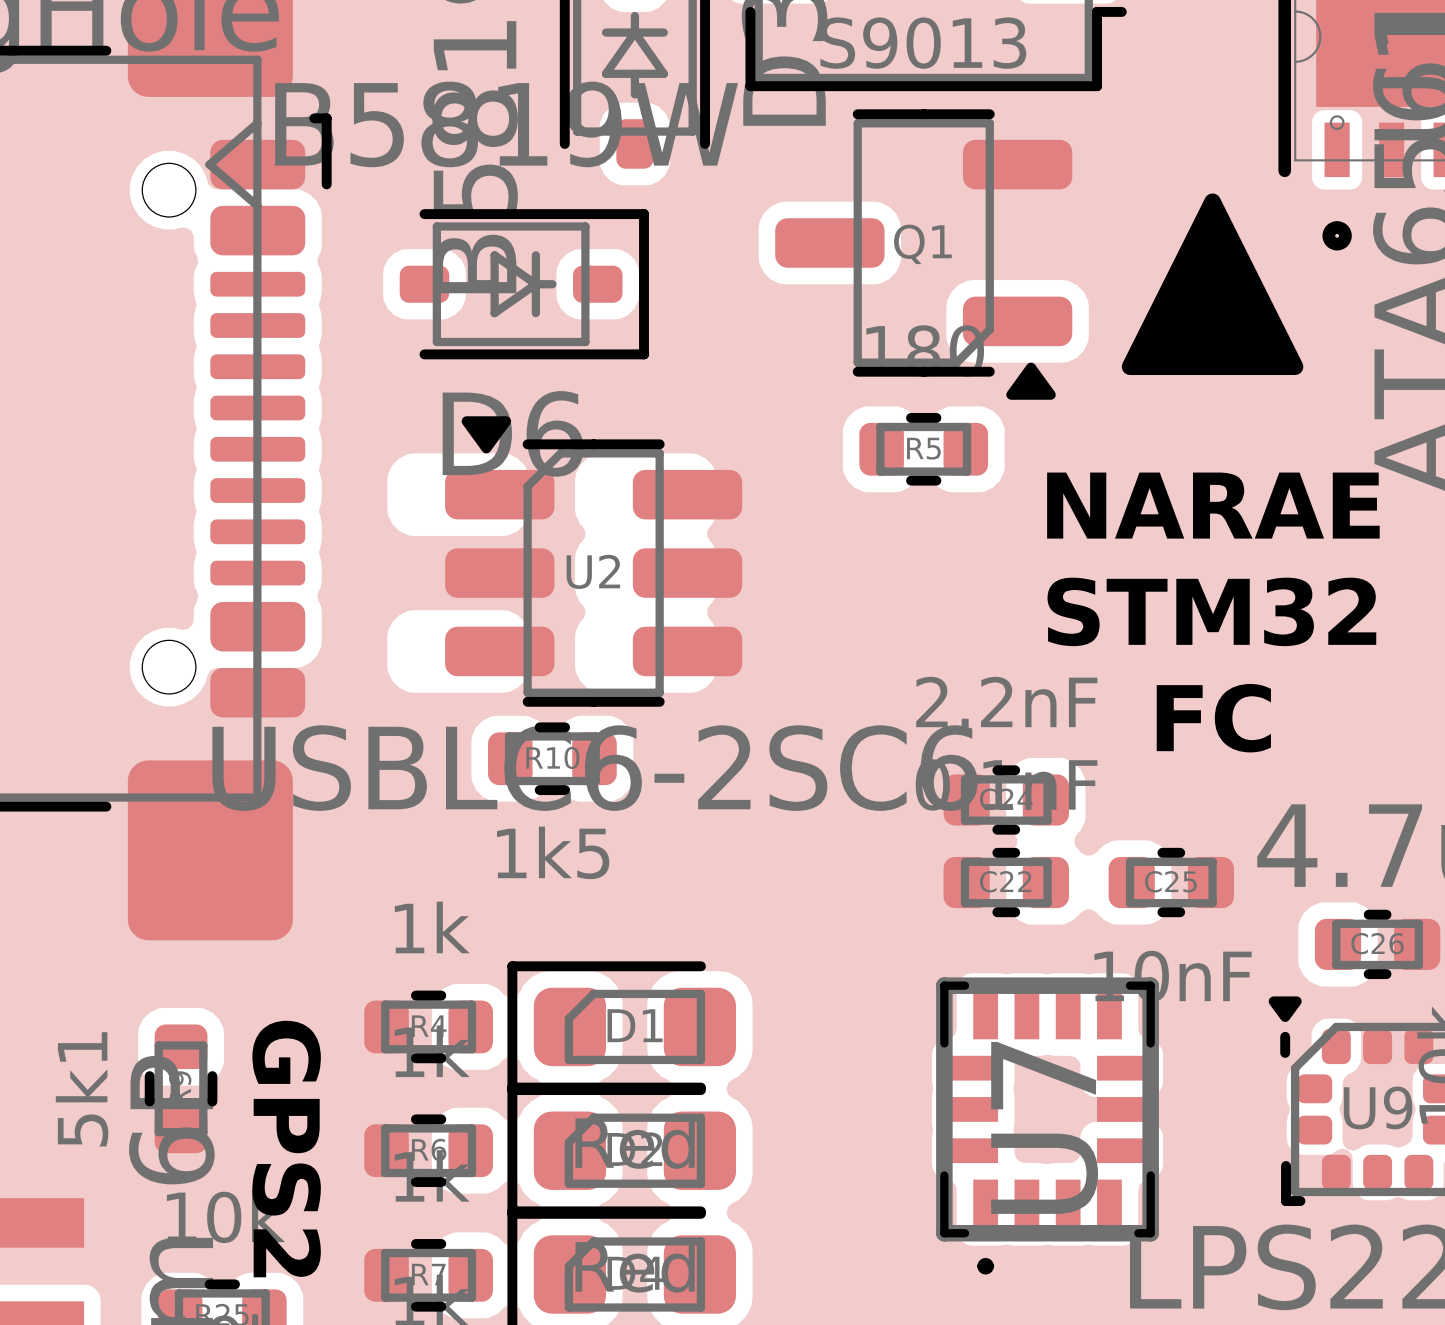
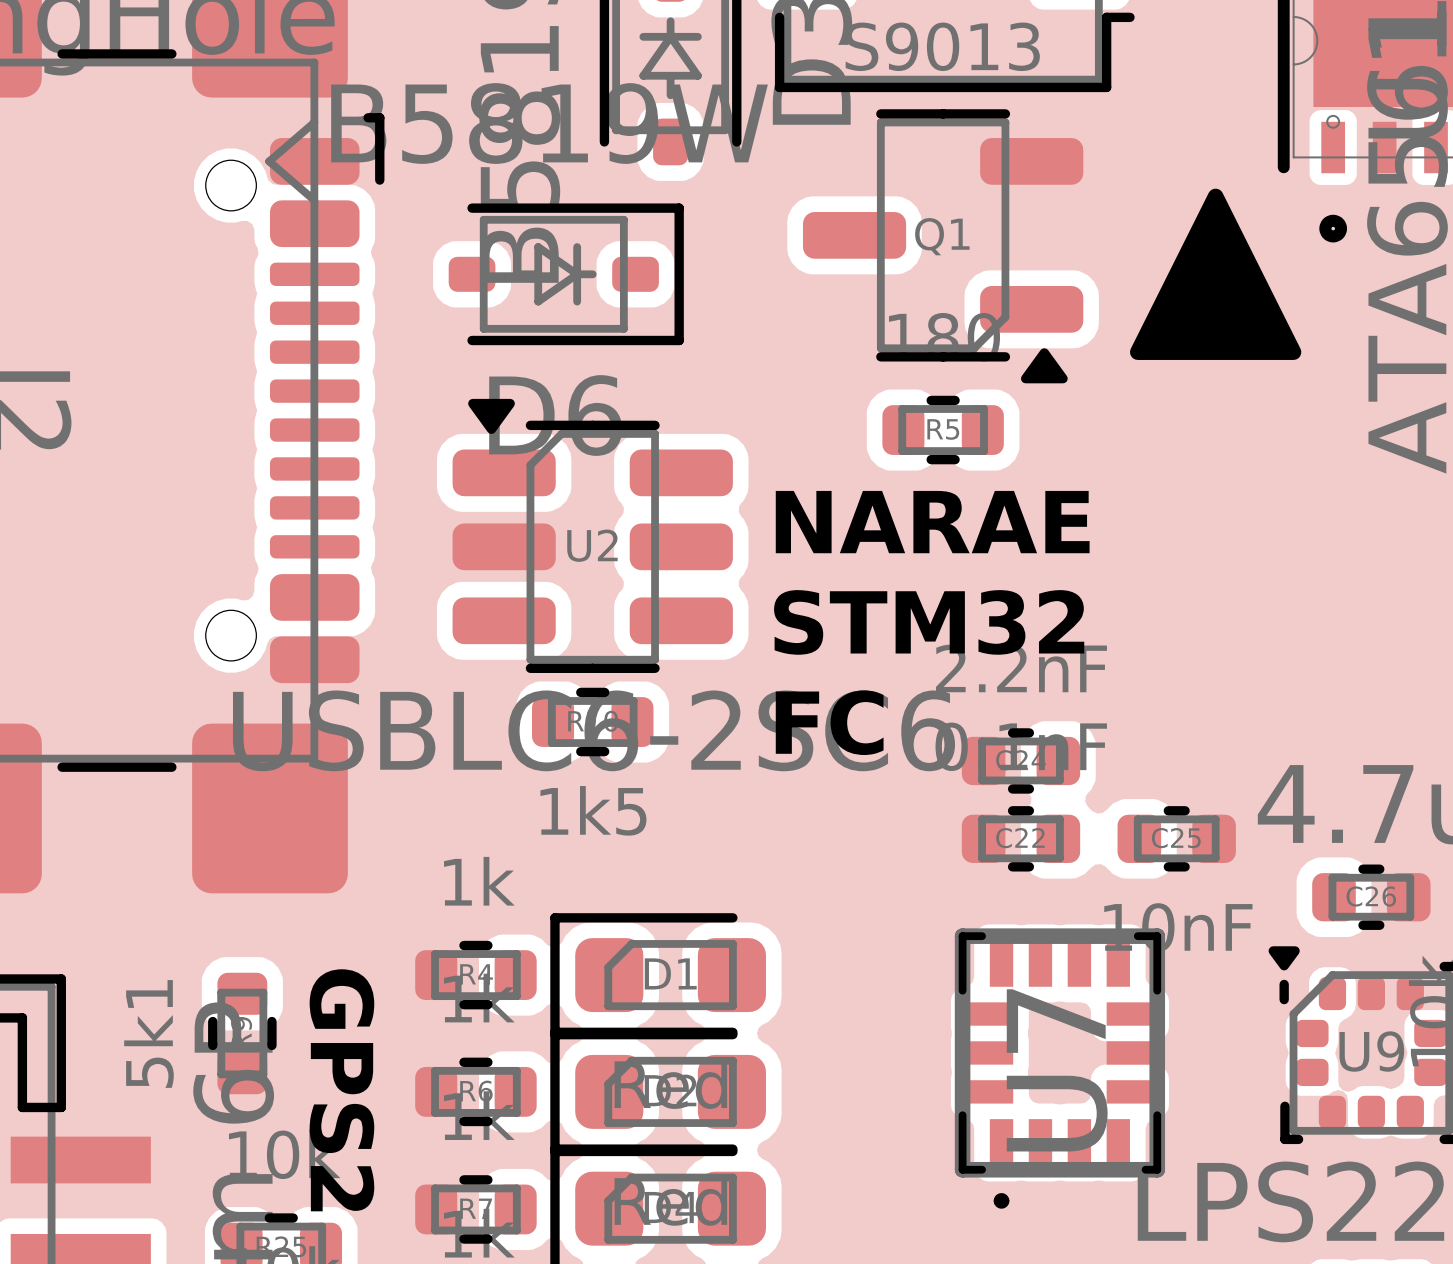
text position: NARAE (1213, 505) -> NARAE (932, 522)
U2 position: (593, 561) -> (592, 535)
text position: STM32 (1211, 611) -> STM32 (929, 622)
text position: FC (1213, 718) -> FC (829, 722)

